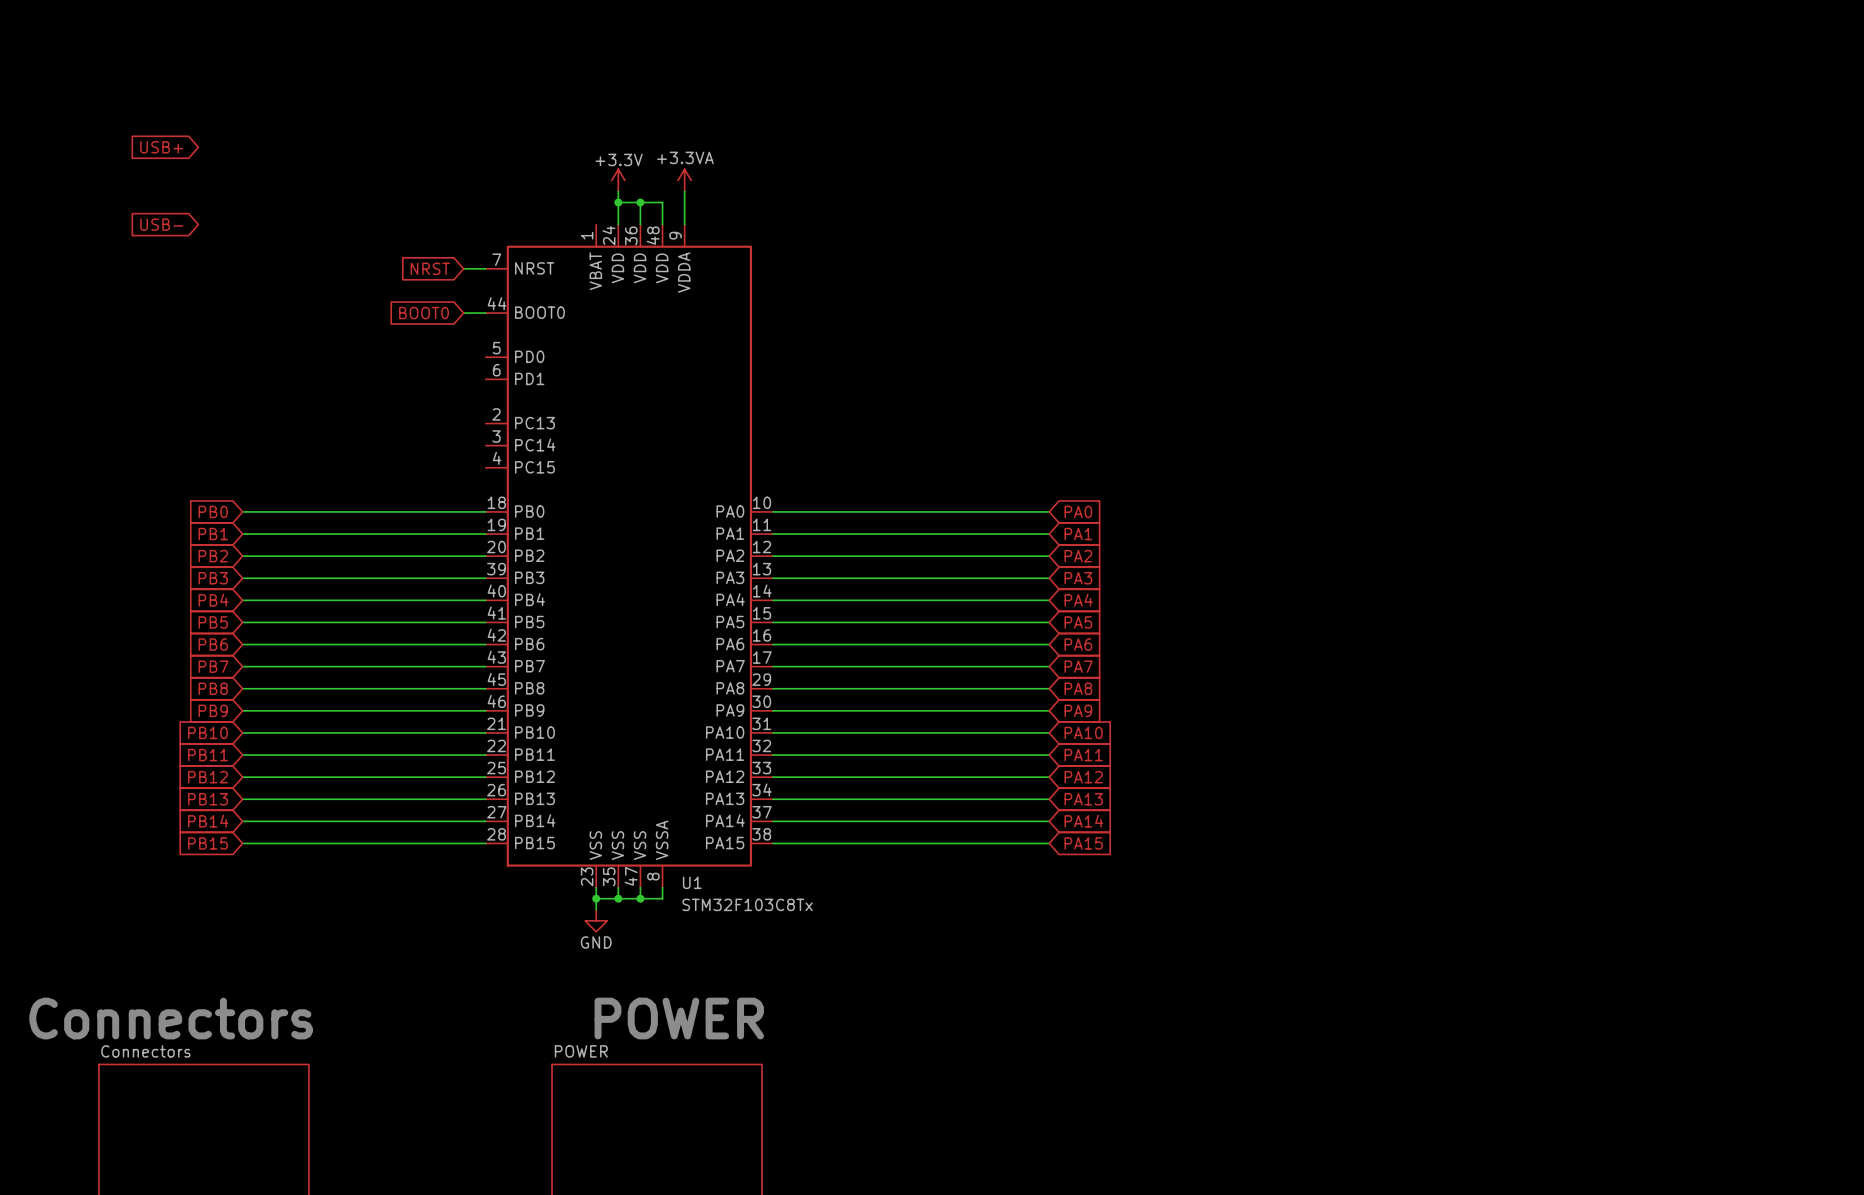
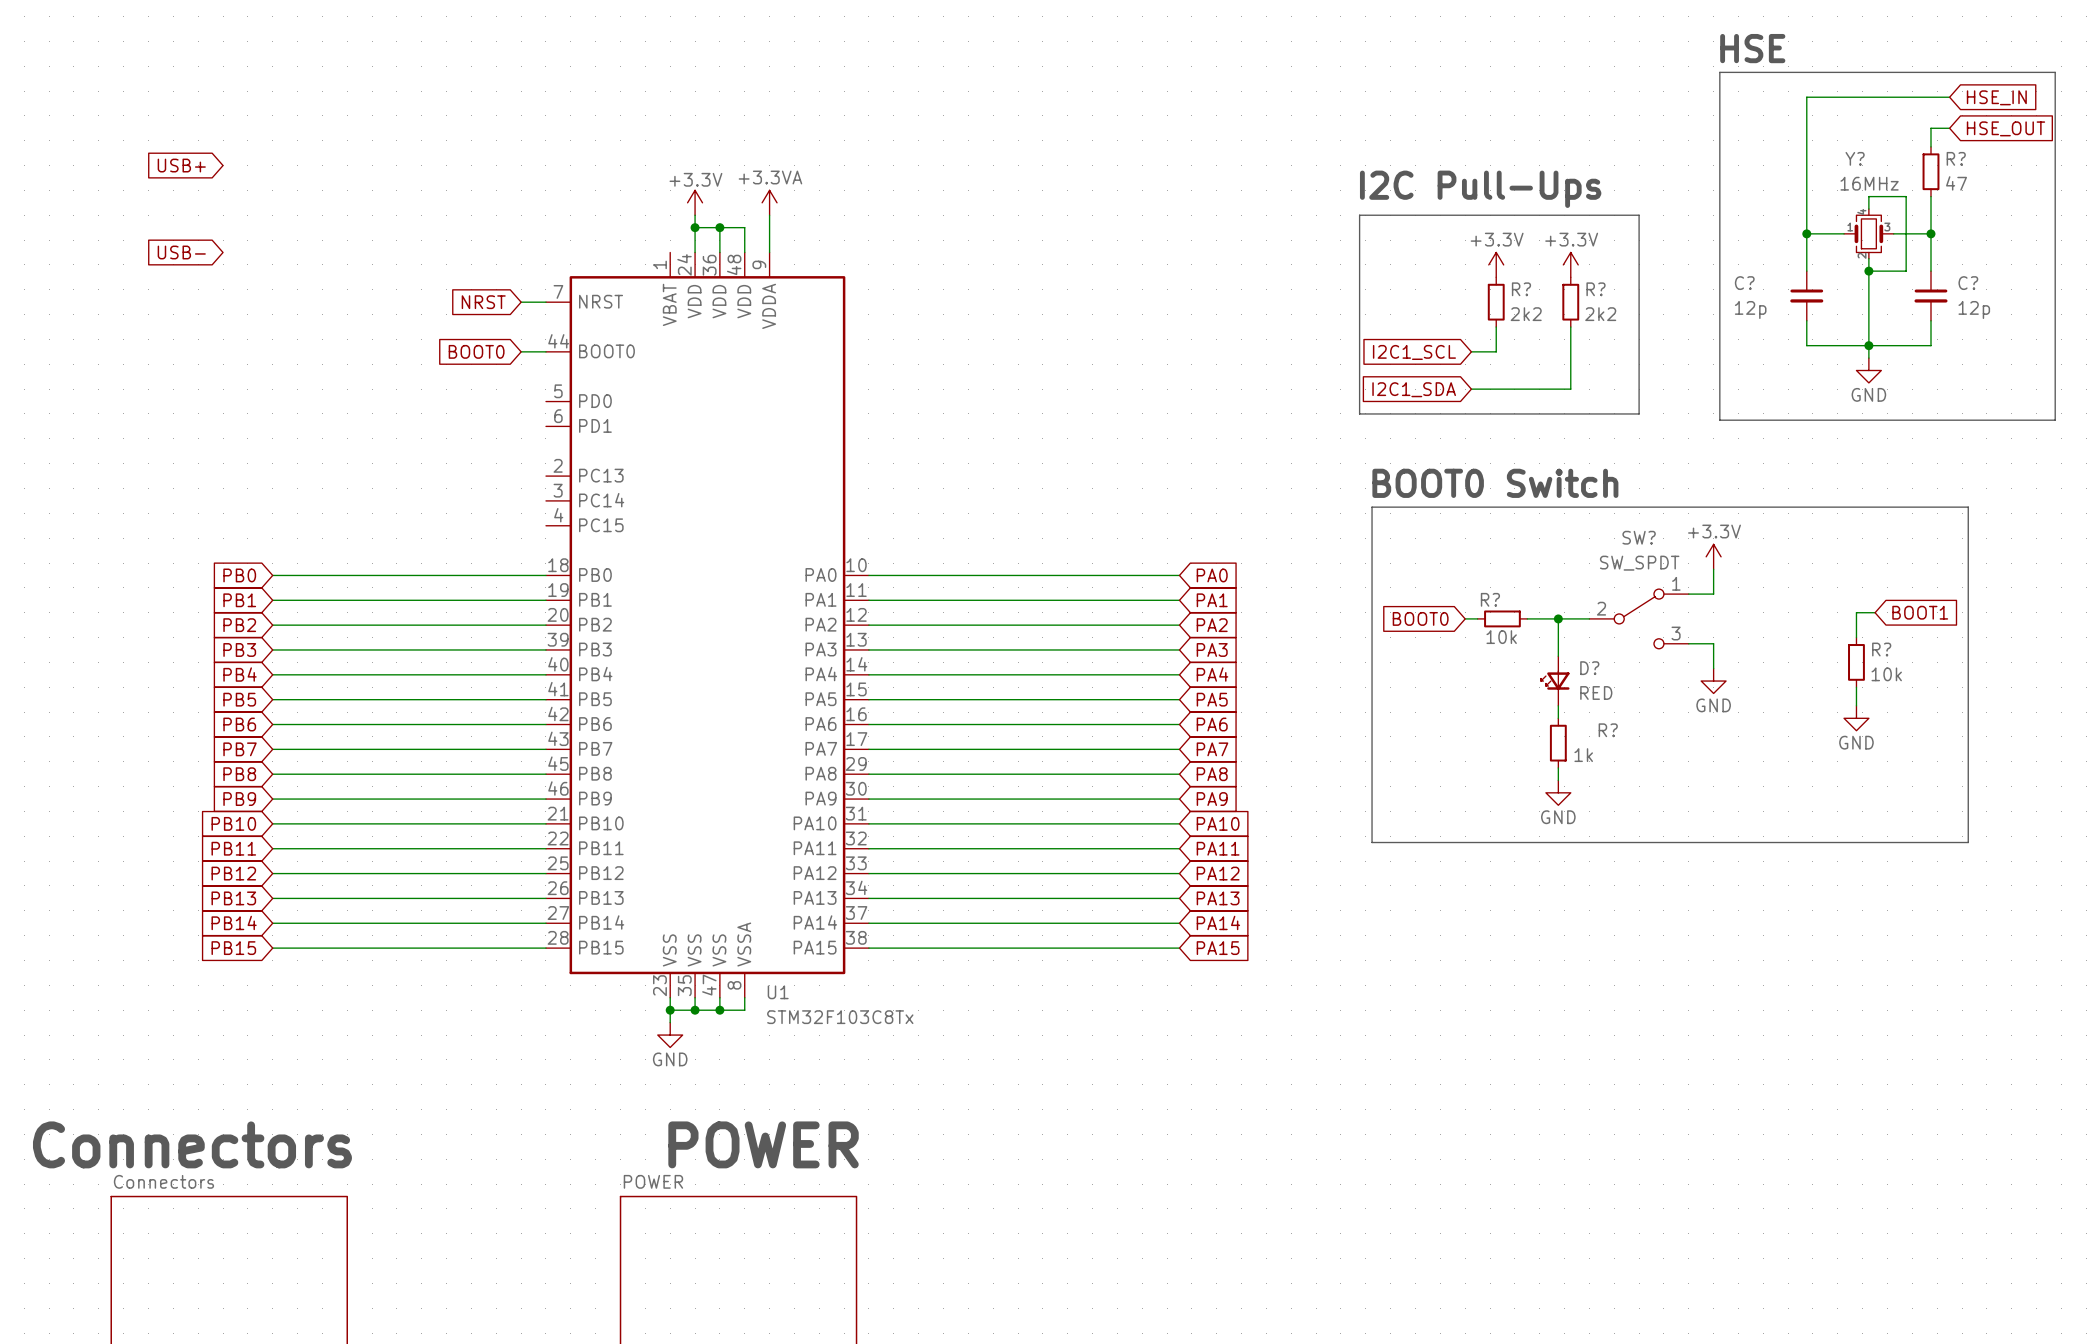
text: none -> HSE (1752, 48)
line: none -> (1719, 72) (2055, 72) (2055, 420) (1719, 420) (1719, 72)
wire: none -> (1949, 97) (1806, 97) (1806, 271)
global label: none -> HSE_IN (1996, 97)
wire: none -> (1949, 128) (1930, 128) (1930, 146)
global label: none -> HSE_OUT (2005, 128)
R?: none -> 47 (1930, 171)
text: none -> I2C Pull-Ups (1480, 189)
wire: none -> (1930, 196) (1930, 271)
wire: none -> (1868, 209) (1868, 196) (1906, 196) (1906, 271) (1868, 271)
line: none -> (1359, 215) (1359, 413) (1639, 413) (1639, 215) (1359, 215)
wire: none -> (1806, 233) (1844, 233)
junction: none -> (1806, 233)
Y?: none -> 16MHz (1868, 233)
wire: none -> (1893, 233) (1930, 233)
junction: none -> (1930, 233)
wire: none -> (1868, 258) (1868, 358)
power symbol: none -> +3.3V (1496, 264)
power symbol: none -> +3.3V (1570, 264)
junction: none -> (1868, 271)
C?: none -> 12p (1806, 295)
C?: none -> 12p (1930, 295)
R?: none -> 2k2 (1496, 302)
R?: none -> 2k2 (1570, 302)
wire: none -> (1806, 320) (1806, 345) (1930, 345) (1930, 320)
wire: none -> (1496, 327) (1496, 351) (1471, 351)
wire: none -> (1570, 327) (1570, 389) (1471, 389)
junction: none -> (1868, 345)
global label: none -> I2C1_SCL (1414, 352)
power symbol: none -> GND (1868, 370)
global label: none -> I2C1_SDA (1414, 389)
text: none -> BOOT0 Switch (1495, 483)
line: none -> (1372, 507) (1968, 507) (1968, 842) (1372, 842) (1372, 507)
power symbol: none -> +3.3V (1713, 556)
wire: none -> (1713, 569) (1713, 594) (1688, 594)
wire: none -> (1875, 612) (1856, 612) (1856, 637)
global label: none -> BOOT1 (1920, 612)
global label: none -> BOOT0 (1420, 618)
wire: none -> (1465, 618) (1477, 618)
R?: none -> 10k (1502, 618)
wire: none -> (1527, 618) (1589, 618)
wire: none -> (1558, 618) (1558, 656)
junction: none -> (1558, 618)
SW?: none -> SW_SPDT (1639, 618)
wire: none -> (1688, 643) (1713, 643) (1713, 668)
R?: none -> 10k (1856, 662)
D?: none -> RED (1555, 681)
power symbol: none -> GND (1713, 681)
wire: none -> (1856, 687) (1856, 705)
wire: none -> (1558, 705) (1558, 718)
power symbol: none -> GND (1856, 718)
R?: none -> 1k (1558, 743)
wire: none -> (1558, 767) (1558, 780)
power symbol: none -> GND (1558, 792)

